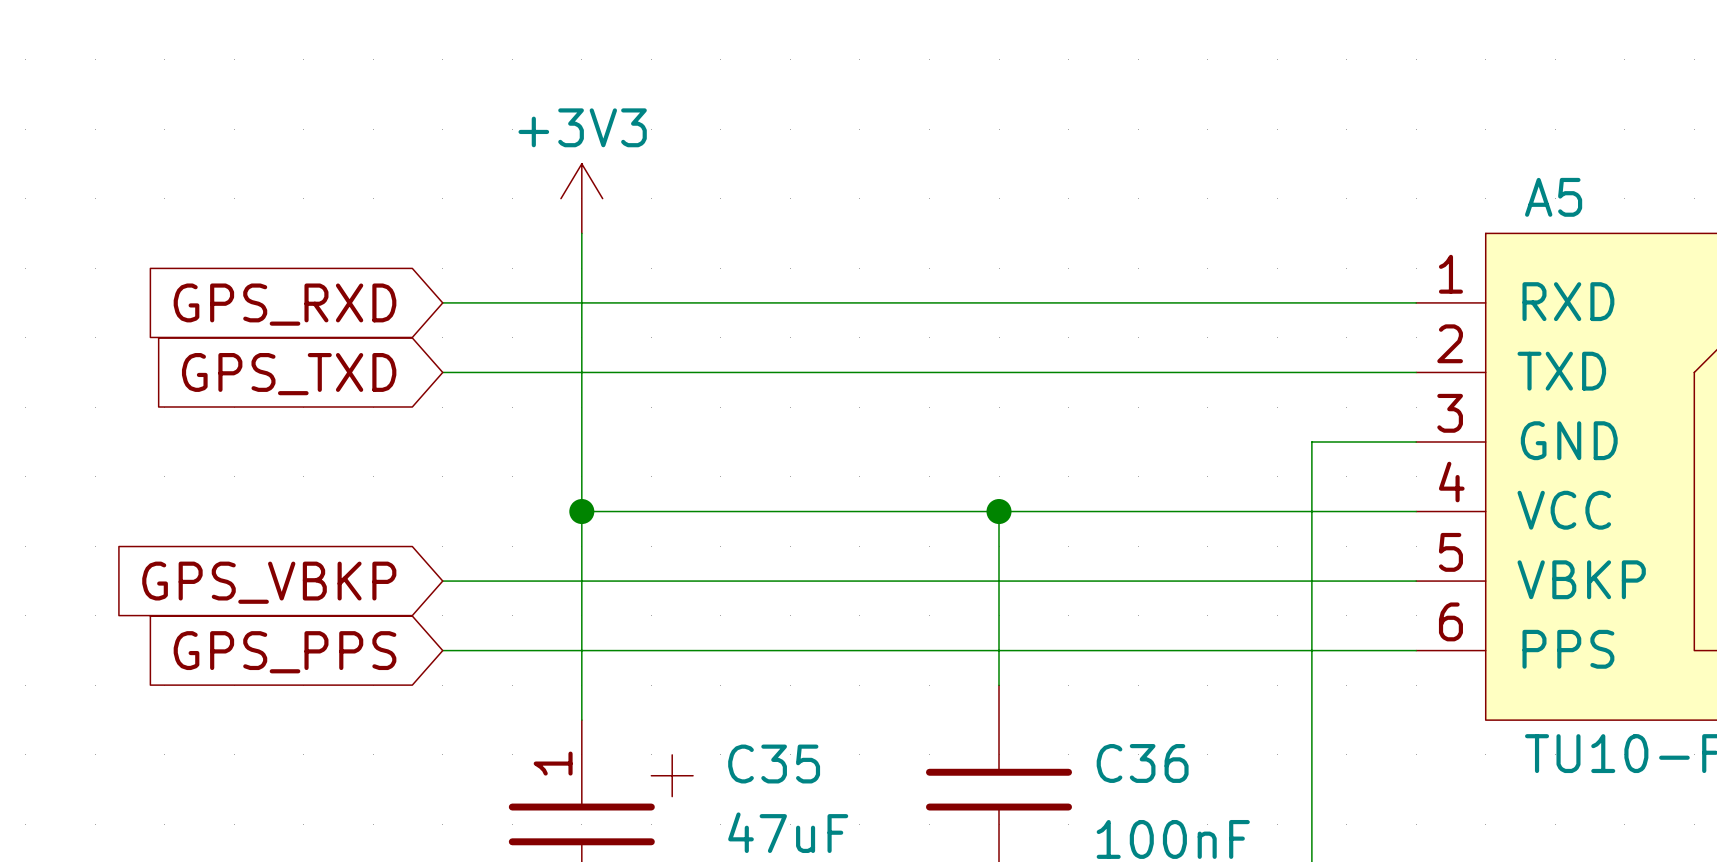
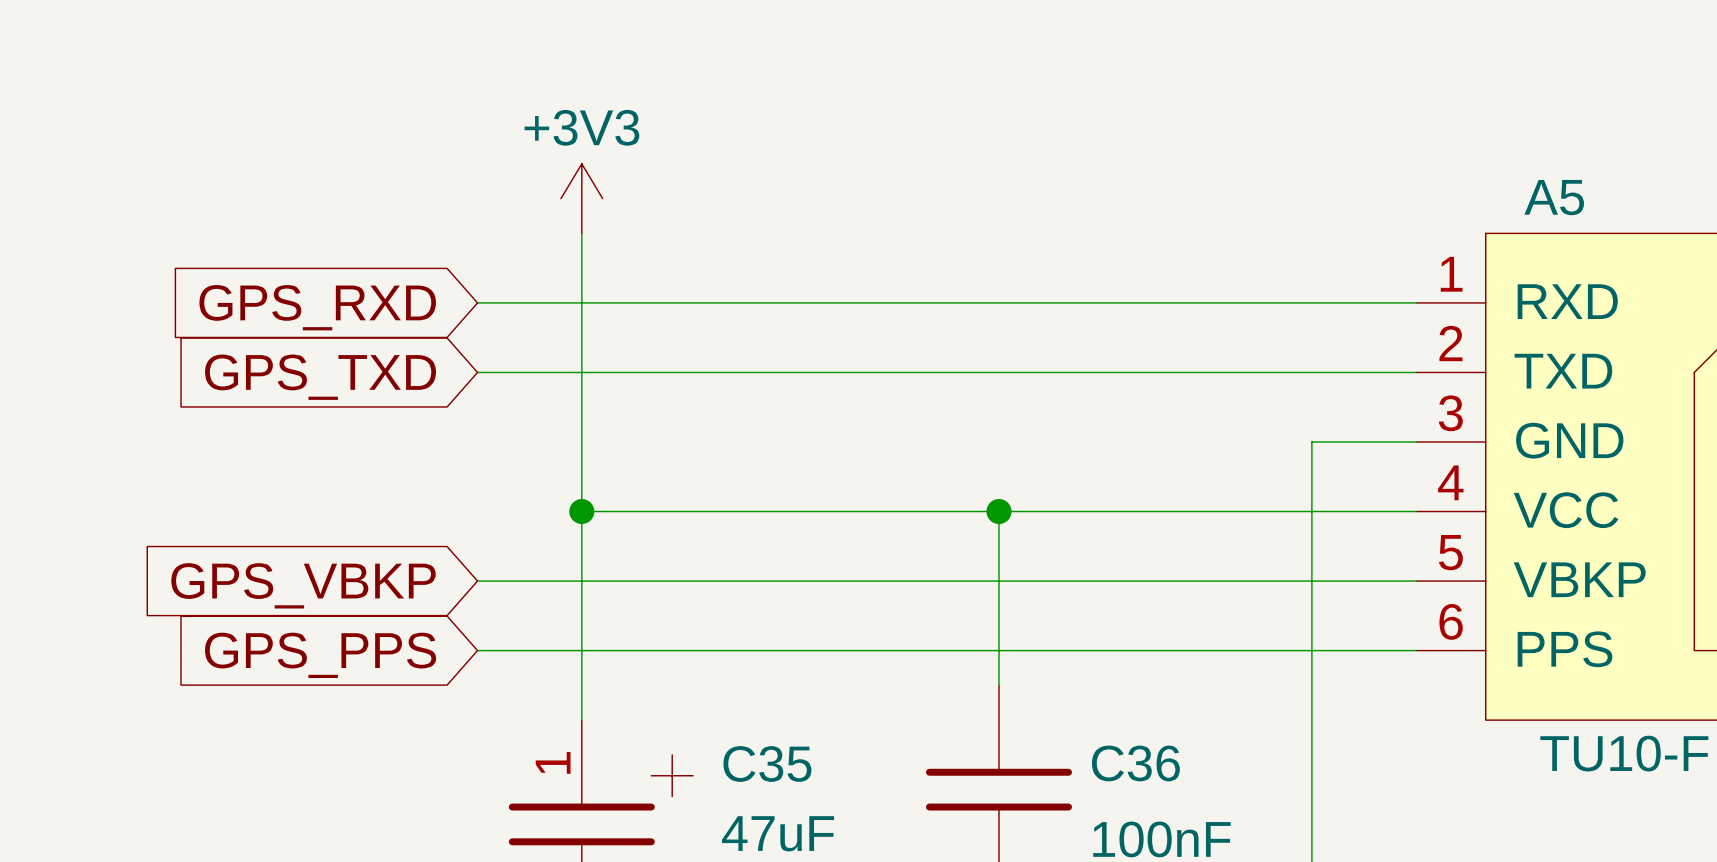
wire: (442, 302) (477, 302) -> none
global label position: GPS_RXD (285, 304) -> GPS_RXD (317, 307)
wire: (442, 372) (477, 372) -> none
global label position: GPS_TXD (289, 374) -> GPS_TXD (320, 377)
wire: (442, 581) (477, 581) -> none
global label position: GPS_VBKP (269, 582) -> GPS_VBKP (303, 585)
wire: (442, 650) (477, 650) -> none
global label position: GPS_PPS (285, 652) -> GPS_PPS (320, 655)

